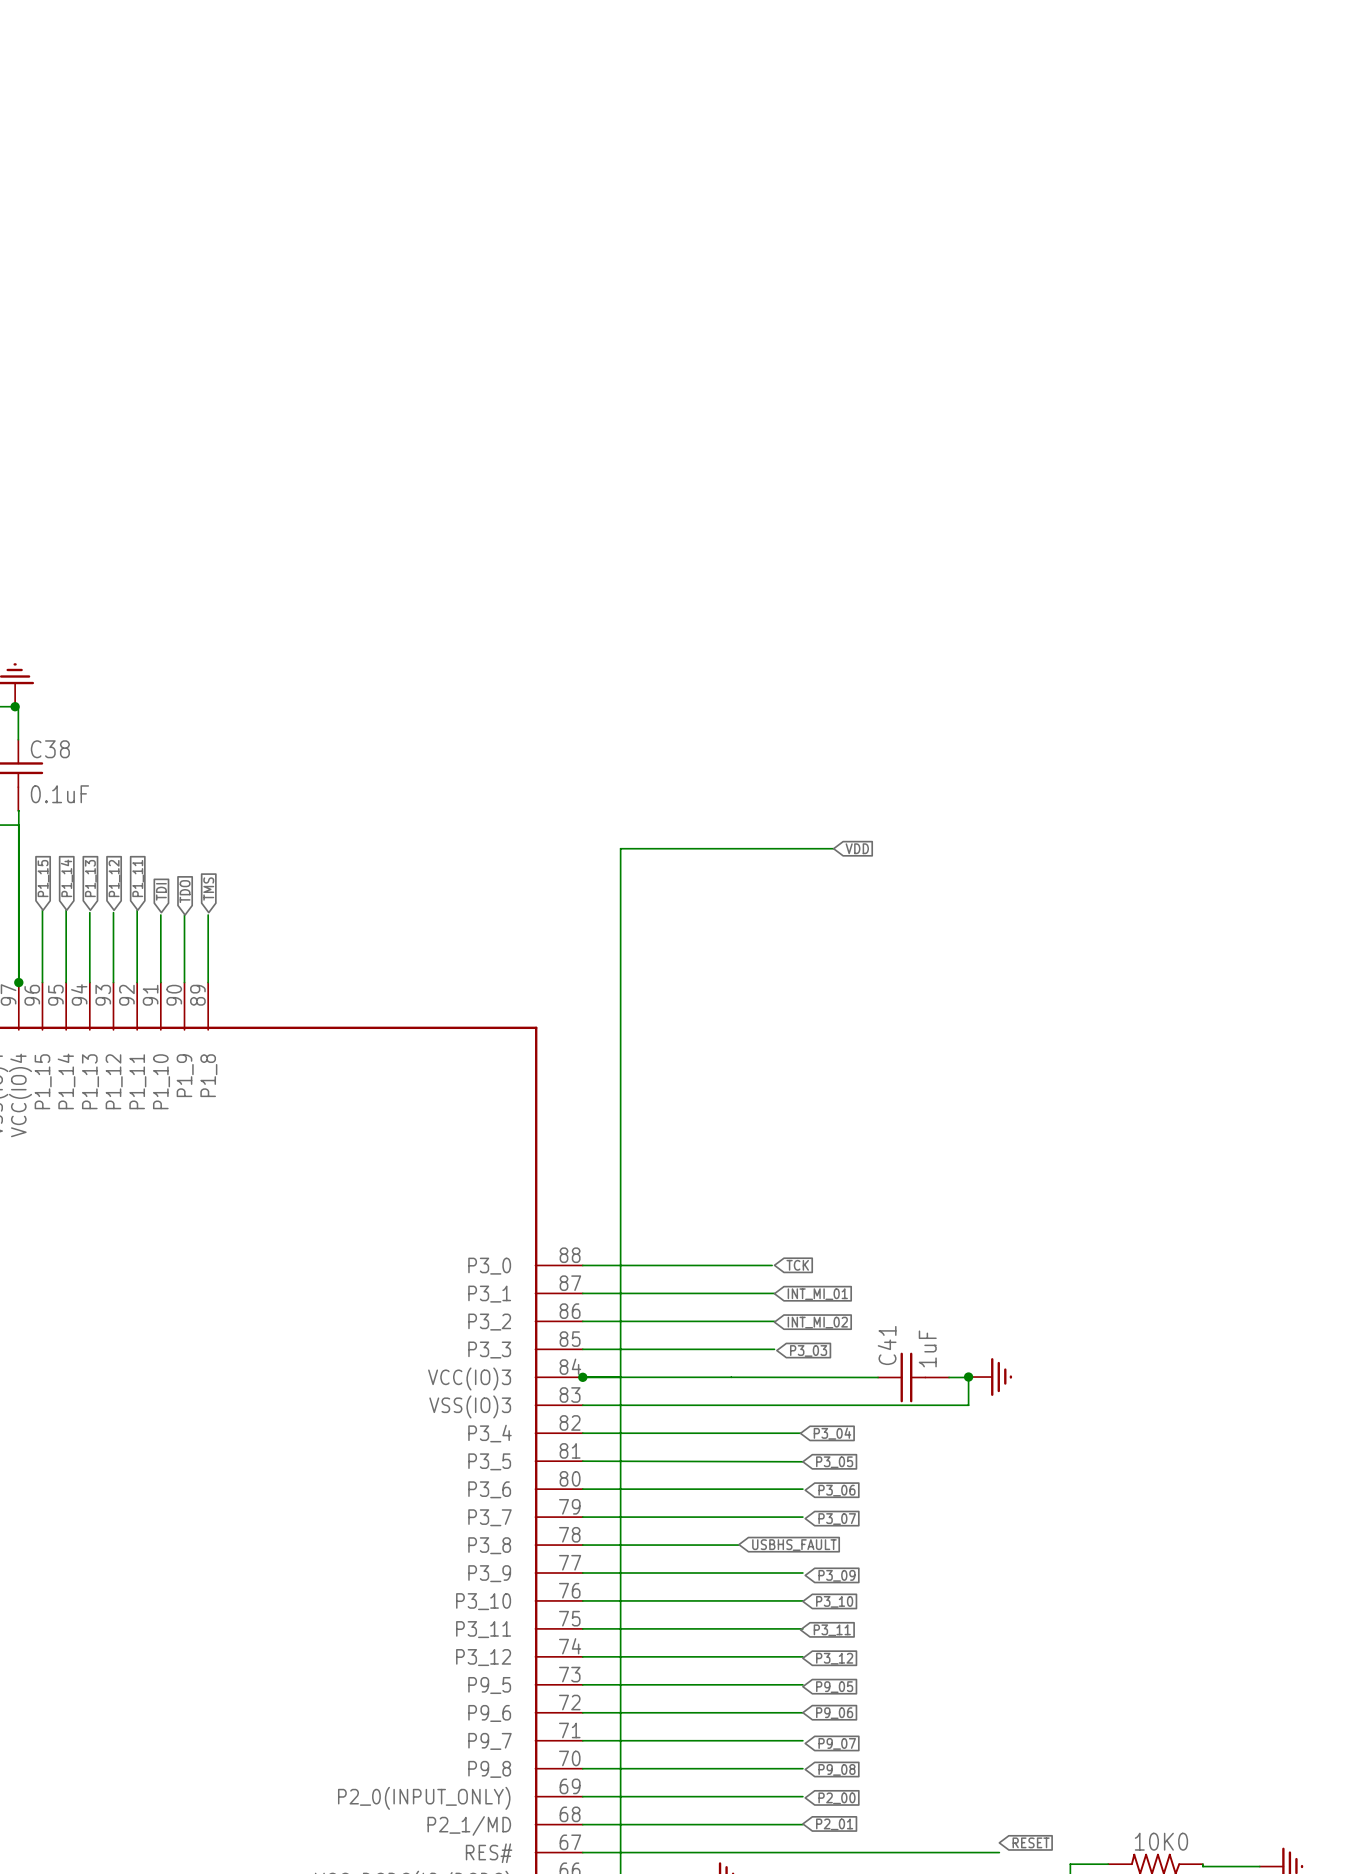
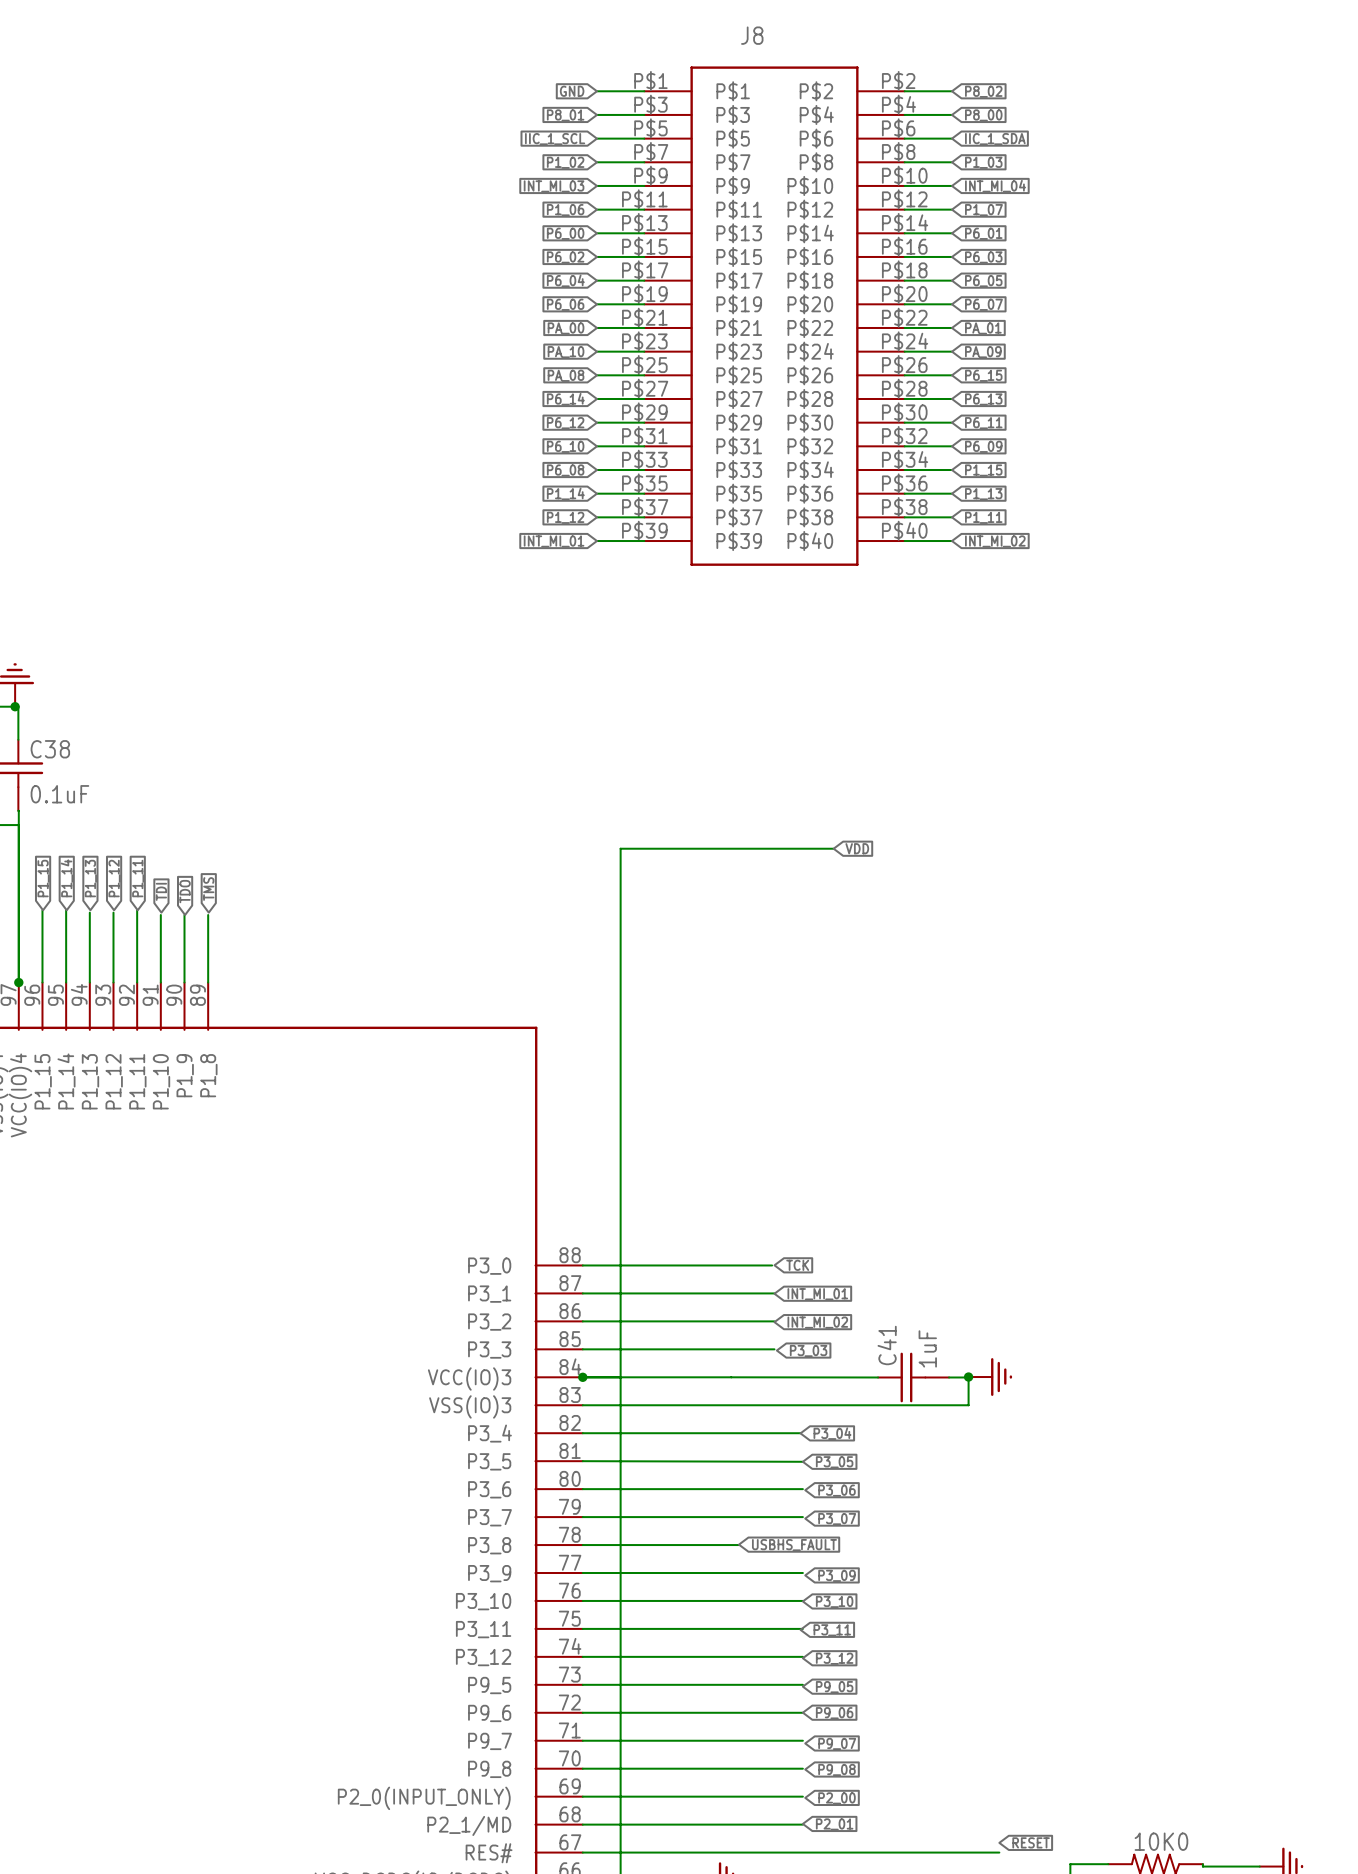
global label: none -> GND (572, 91)
wire: none -> (596, 91) (644, 91)
wire: none -> (904, 91) (952, 91)
global label: none -> P8_02 (983, 91)
wire: none -> (596, 114) (644, 114)
wire: none -> (904, 114) (952, 114)
global label: none -> P8_01 (565, 115)
global label: none -> P8_00 (983, 115)
wire: none -> (596, 138) (644, 138)
wire: none -> (904, 138) (952, 138)
global label: none -> IIC_1_SCL (555, 139)
global label: none -> IIC_1_SDA (995, 139)
global label: none -> P1_02 (565, 162)
wire: none -> (596, 162) (644, 162)
wire: none -> (904, 162) (952, 162)
global label: none -> P1_03 (983, 162)
wire: none -> (596, 185) (644, 185)
wire: none -> (904, 185) (952, 185)
global label: none -> INT_MI_03 (554, 186)
global label: none -> INT_MI_04 (995, 186)
wire: none -> (596, 209) (644, 209)
wire: none -> (904, 209) (952, 209)
global label: none -> P1_06 (565, 210)
global label: none -> P1_07 (983, 210)
global label: none -> P6_00 (565, 233)
wire: none -> (596, 233) (644, 233)
wire: none -> (904, 233) (952, 233)
global label: none -> P6_01 (983, 233)
wire: none -> (596, 256) (644, 256)
wire: none -> (904, 256) (952, 256)
global label: none -> P6_02 (565, 257)
global label: none -> P6_03 (983, 257)
global label: none -> P6_04 (565, 280)
wire: none -> (596, 280) (644, 280)
wire: none -> (904, 280) (952, 280)
global label: none -> P6_05 (983, 281)
global label: none -> P6_06 (565, 304)
wire: none -> (596, 304) (644, 304)
wire: none -> (904, 304) (952, 304)
global label: none -> P6_07 (983, 304)
J8: none -> (774, 316)
wire: none -> (596, 327) (644, 327)
wire: none -> (904, 327) (952, 327)
global label: none -> PA_00 (566, 328)
global label: none -> PA_01 (983, 328)
wire: none -> (596, 351) (644, 351)
wire: none -> (904, 351) (952, 351)
global label: none -> PA_10 (566, 352)
global label: none -> PA_09 (983, 352)
global label: none -> PA_08 (566, 375)
wire: none -> (596, 375) (644, 375)
wire: none -> (904, 375) (952, 375)
global label: none -> P6_15 (983, 375)
wire: none -> (596, 398) (644, 398)
wire: none -> (904, 398) (952, 398)
global label: none -> P6_14 (565, 399)
global label: none -> P6_13 (983, 399)
wire: none -> (596, 422) (644, 422)
wire: none -> (904, 422) (952, 422)
global label: none -> P6_12 (565, 423)
global label: none -> P6_11 (983, 423)
global label: none -> P6_10 (565, 446)
wire: none -> (596, 446) (644, 446)
wire: none -> (904, 446) (952, 446)
global label: none -> P6_09 (983, 446)
global label: none -> P6_08 (565, 470)
wire: none -> (596, 470) (644, 470)
wire: none -> (904, 470) (952, 470)
global label: none -> P1_15 (983, 470)
global label: none -> P1_14 (565, 493)
wire: none -> (596, 493) (644, 493)
wire: none -> (904, 493) (952, 493)
global label: none -> P1_13 (983, 494)
global label: none -> P1_12 (565, 517)
wire: none -> (596, 517) (644, 517)
wire: none -> (904, 517) (952, 517)
global label: none -> P1_11 (983, 517)
global label: none -> INT_MI_01 (554, 541)
wire: none -> (596, 541) (644, 541)
wire: none -> (904, 541) (952, 541)
global label: none -> INT_MI_02 (995, 541)

